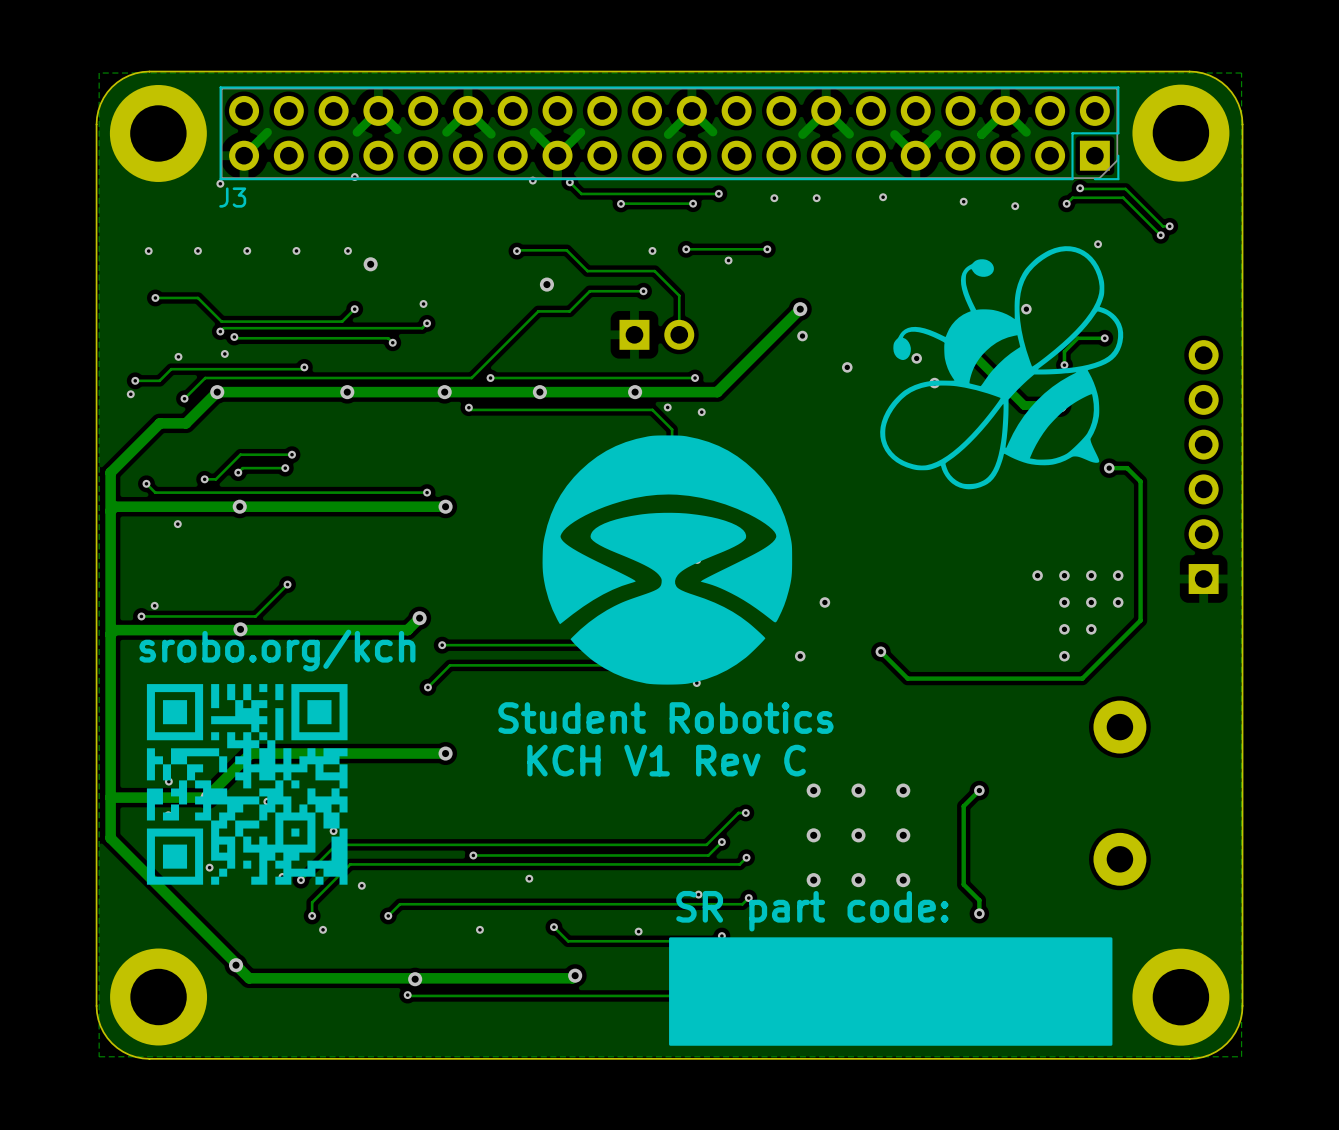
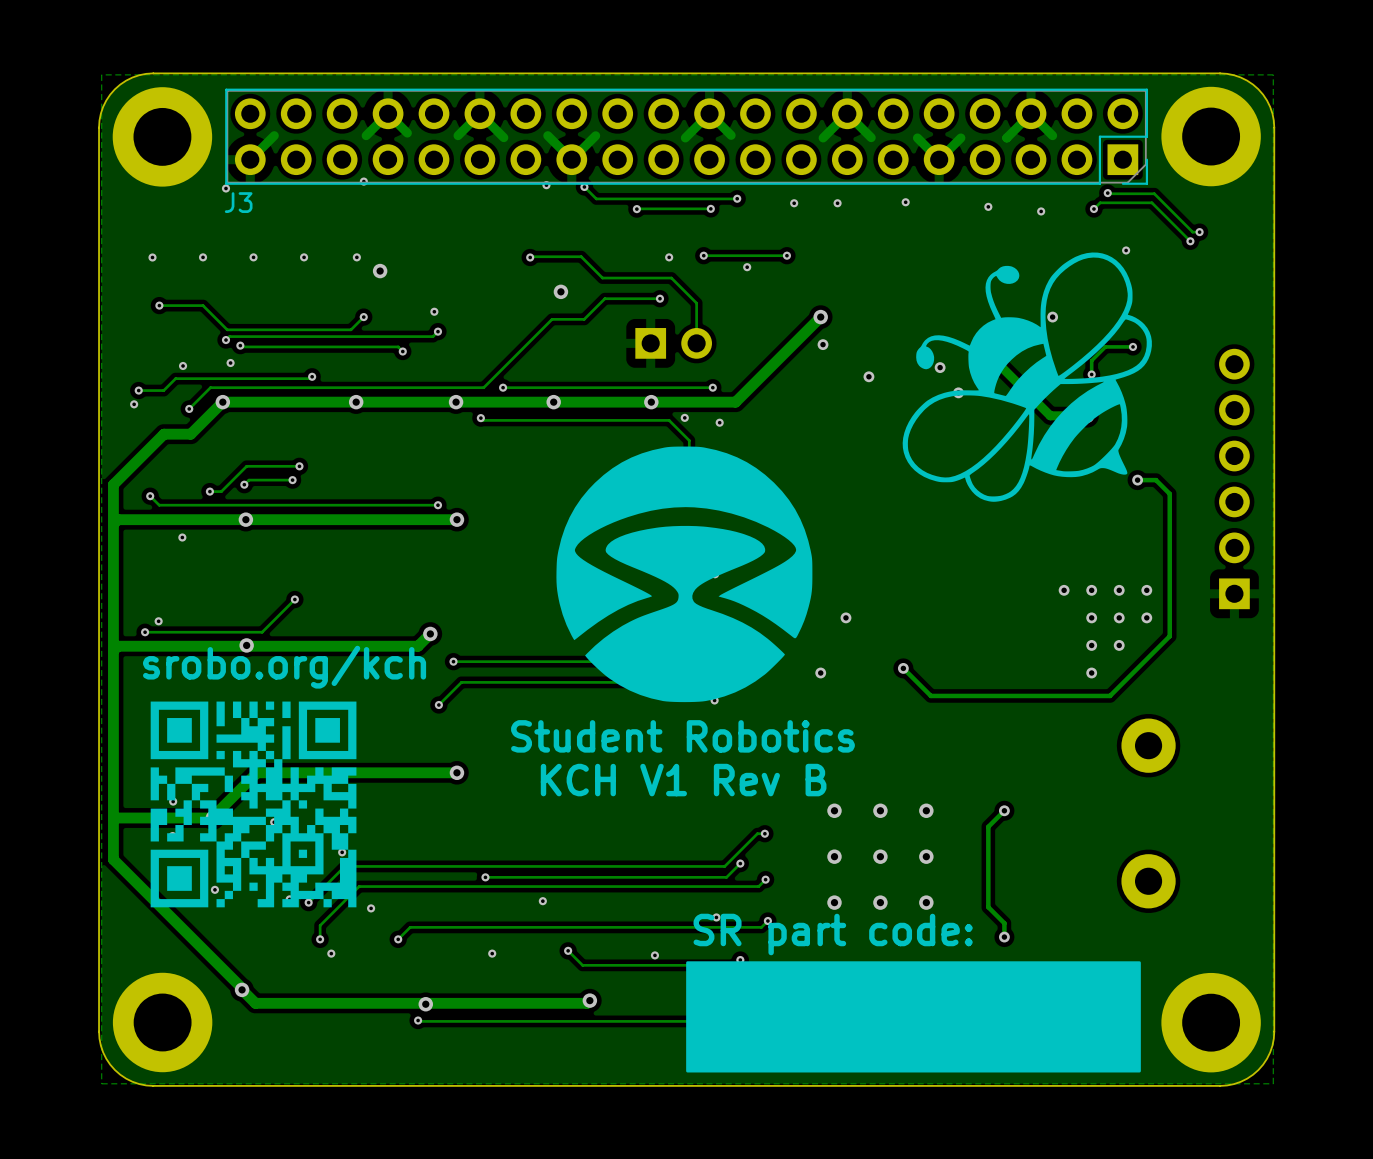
text: KCH V1 Rev C (666, 760) -> KCH V1 Rev B (683, 780)

